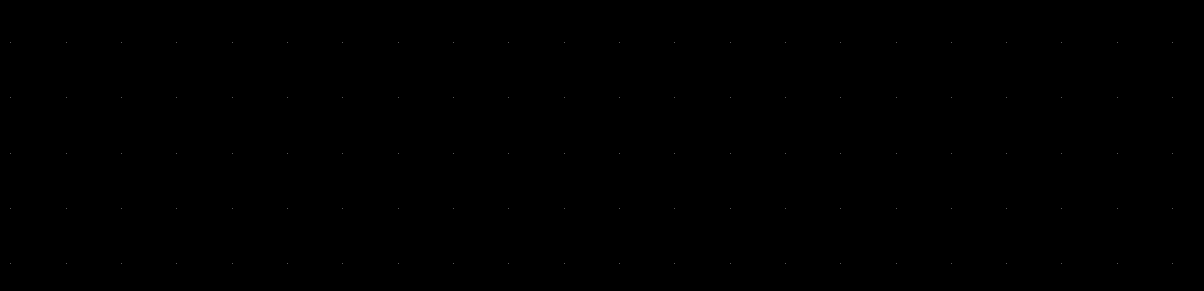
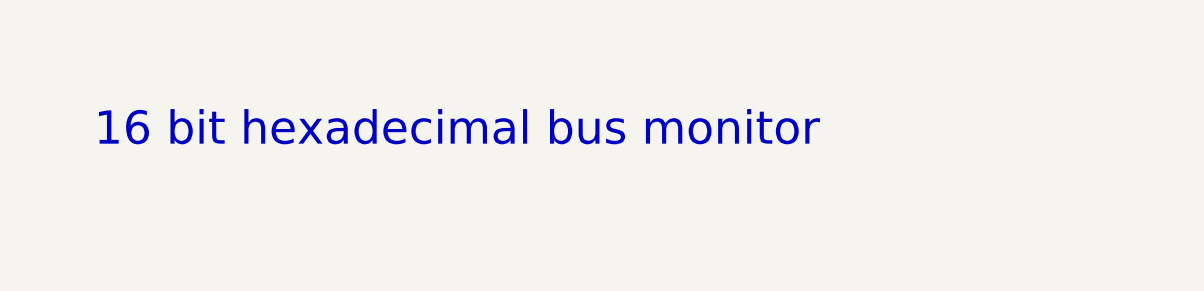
text: none -> 16 bit hexadecimal bus monitor (459, 126)

